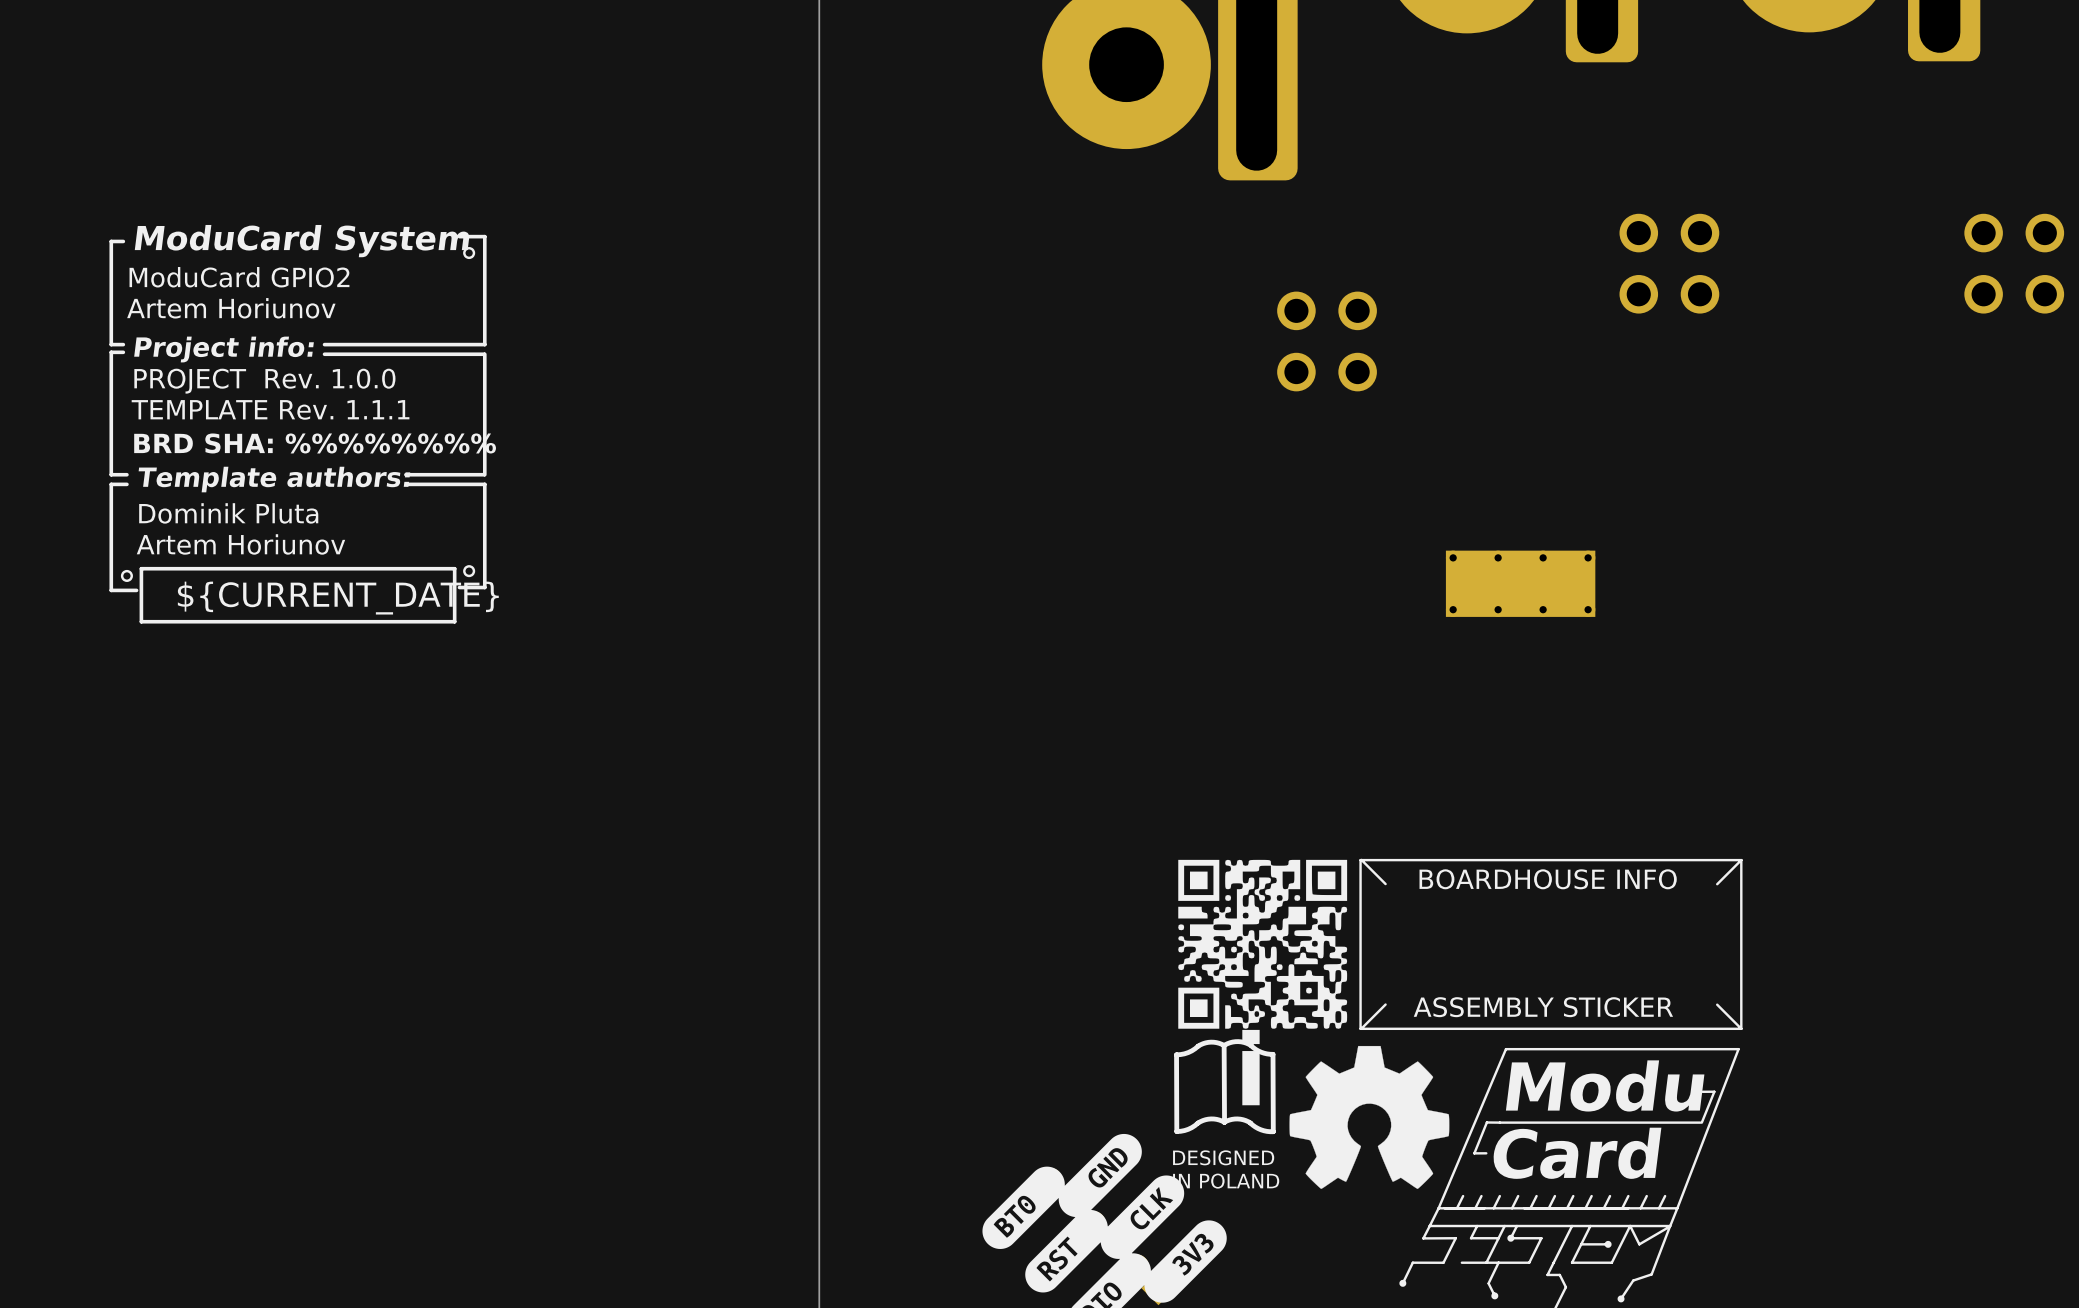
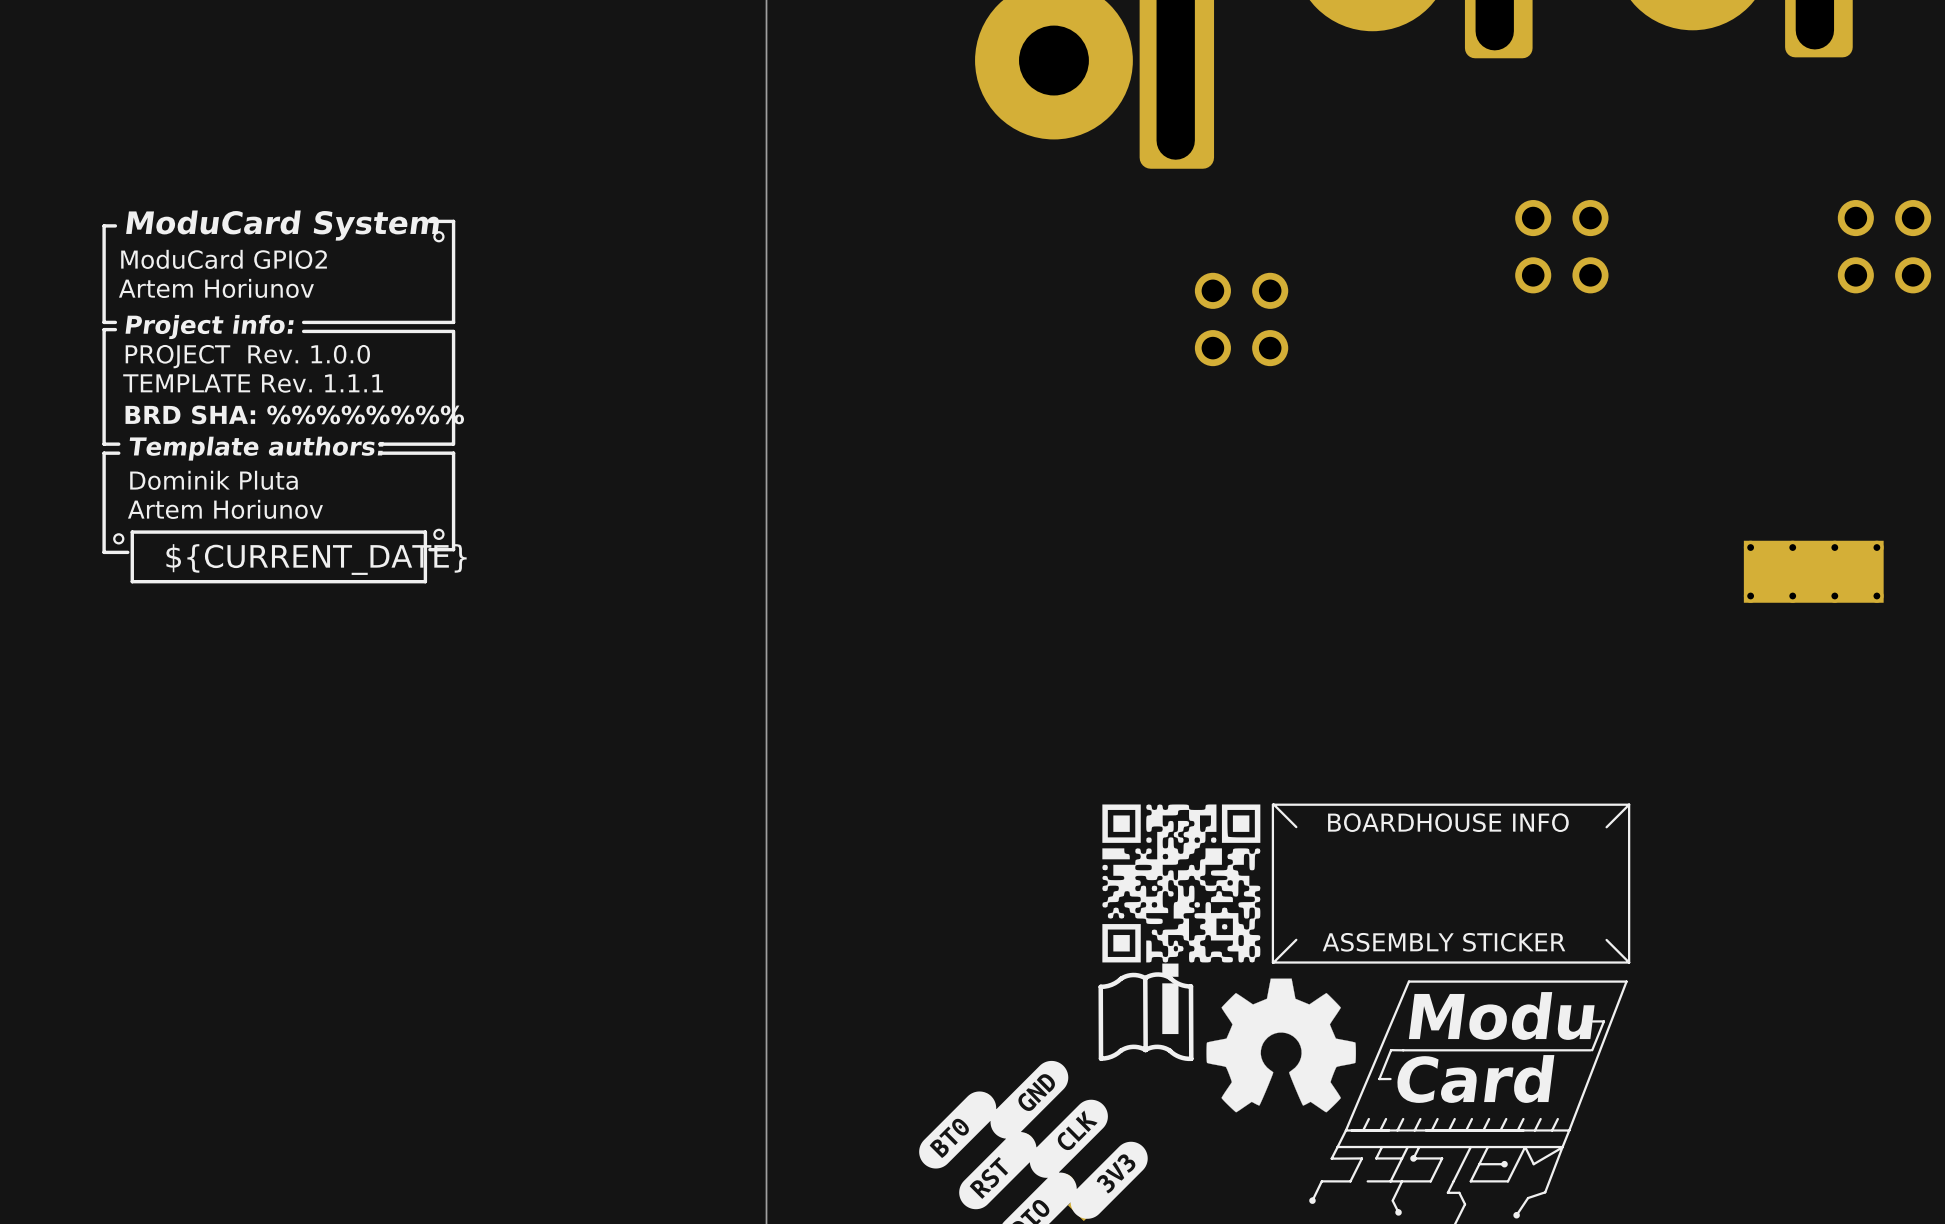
part position: (1520, 583) -> (1813, 571)
text: DESIGNED (1223, 1157) -> none
text: IN POLAND (1226, 1181) -> none

